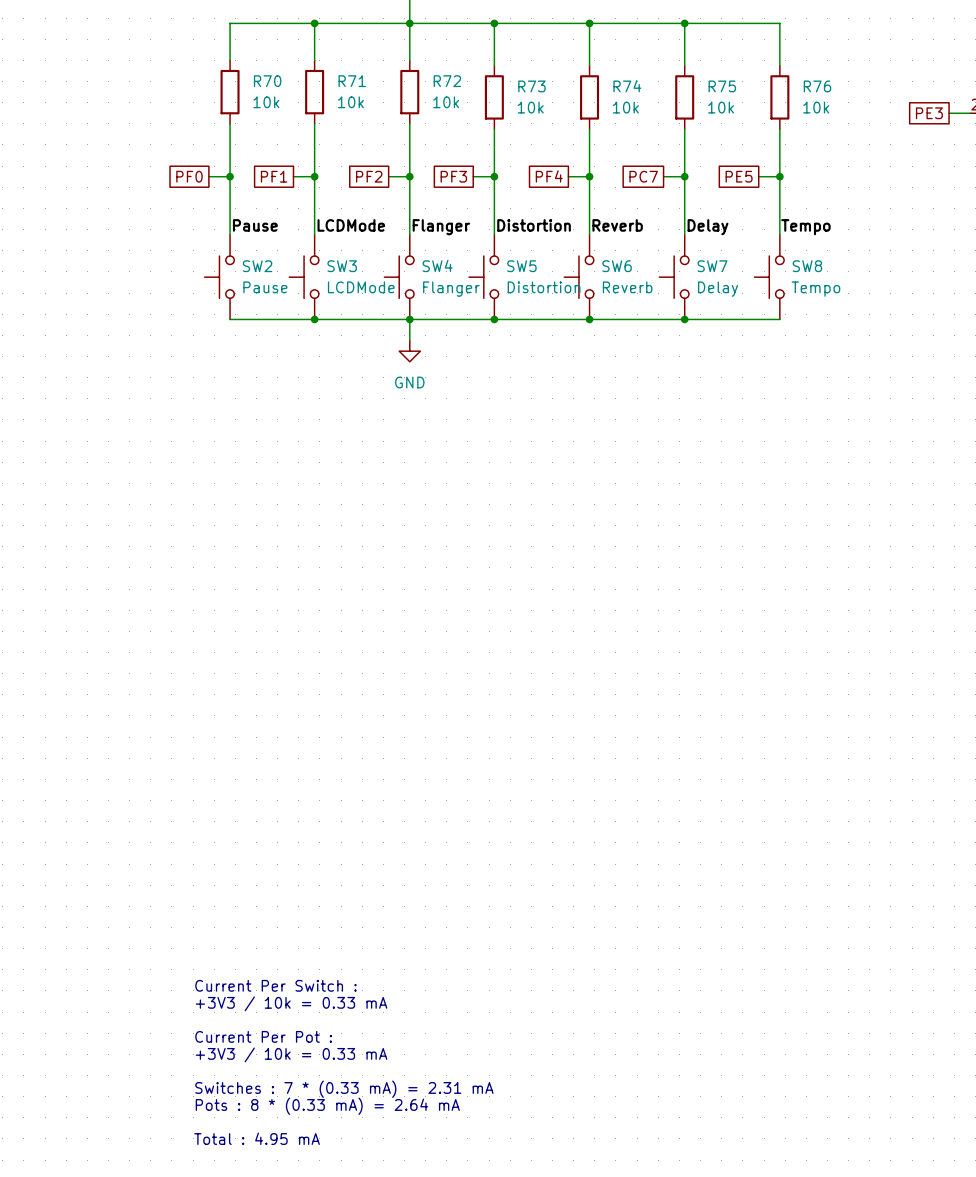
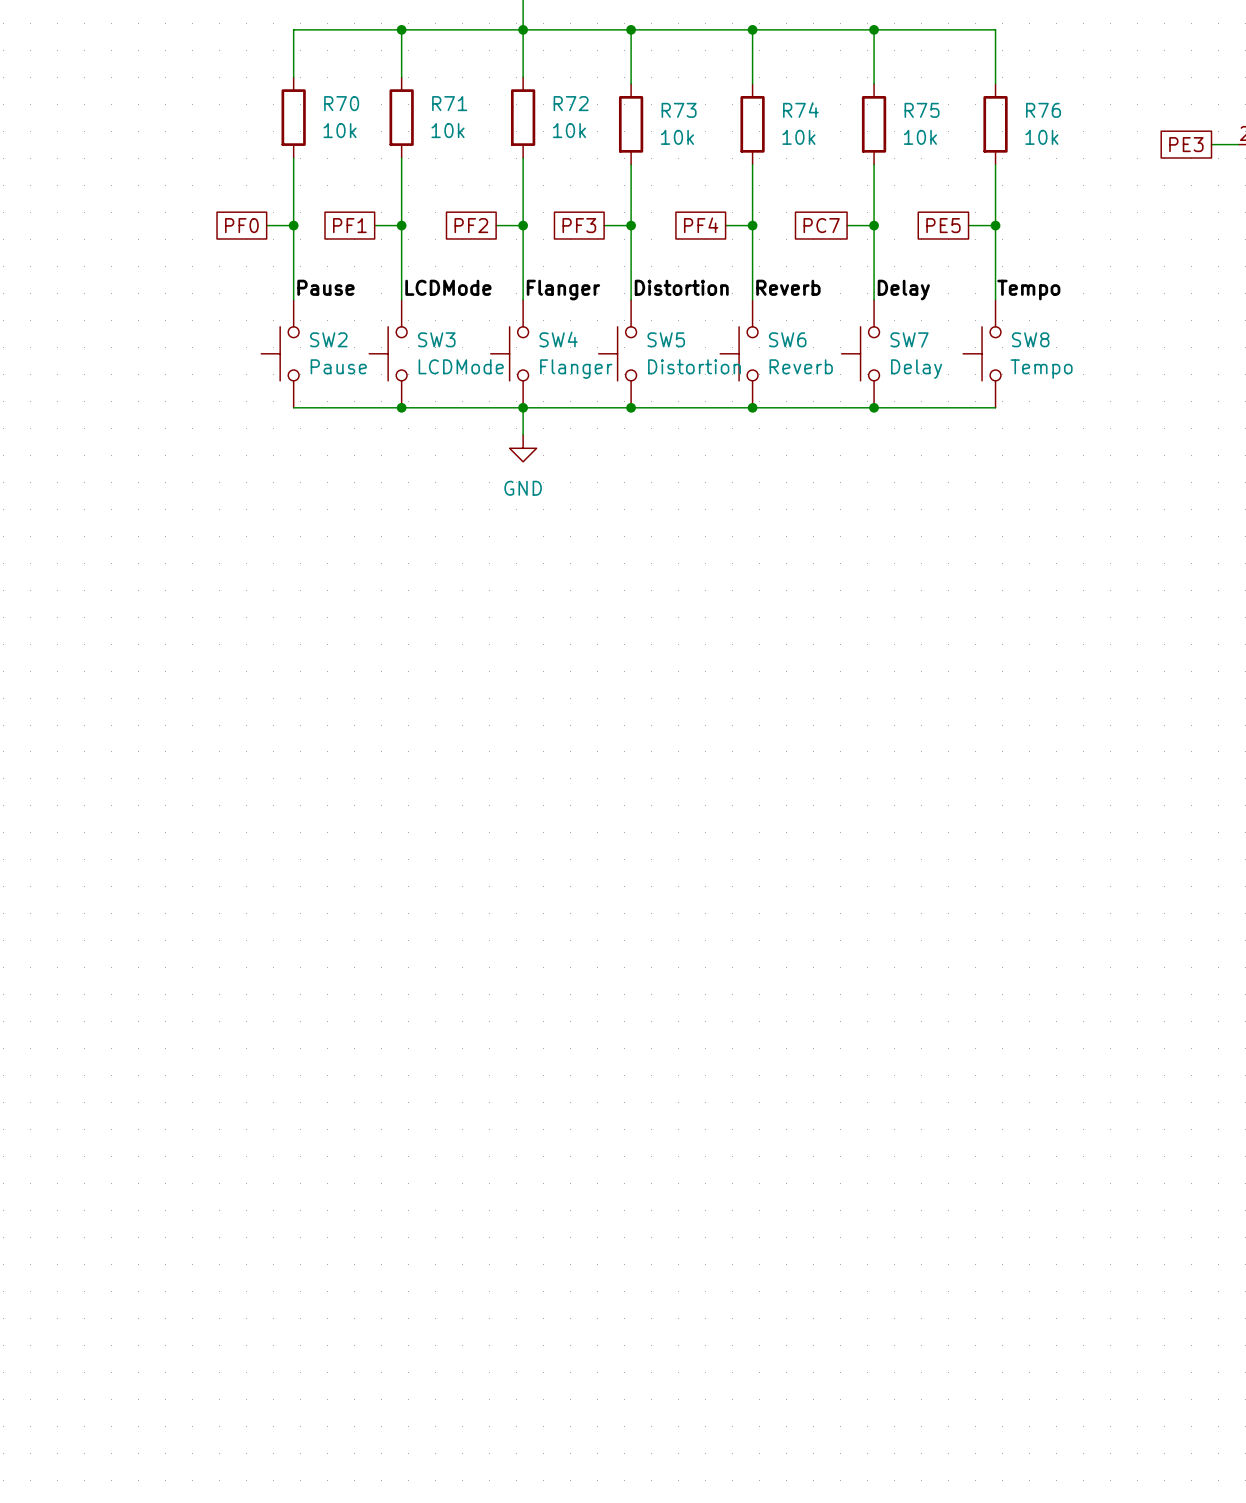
text: Current Per Switch : (275, 985) -> none
text: +3V3 / 10k = 0.33 mA (291, 1003) -> none
text: Current Per Pot : (263, 1036) -> none
text: +3V3 / 10k = 0.33 mA (291, 1054) -> none
text: Switches : 7 * (0.33 mA) = 2.31 mA (344, 1089) -> none
text: Pots : 8 * (0.33 mA) = 2.64 mA (327, 1106) -> none
text: Total : 4.95 mA (257, 1138) -> none

